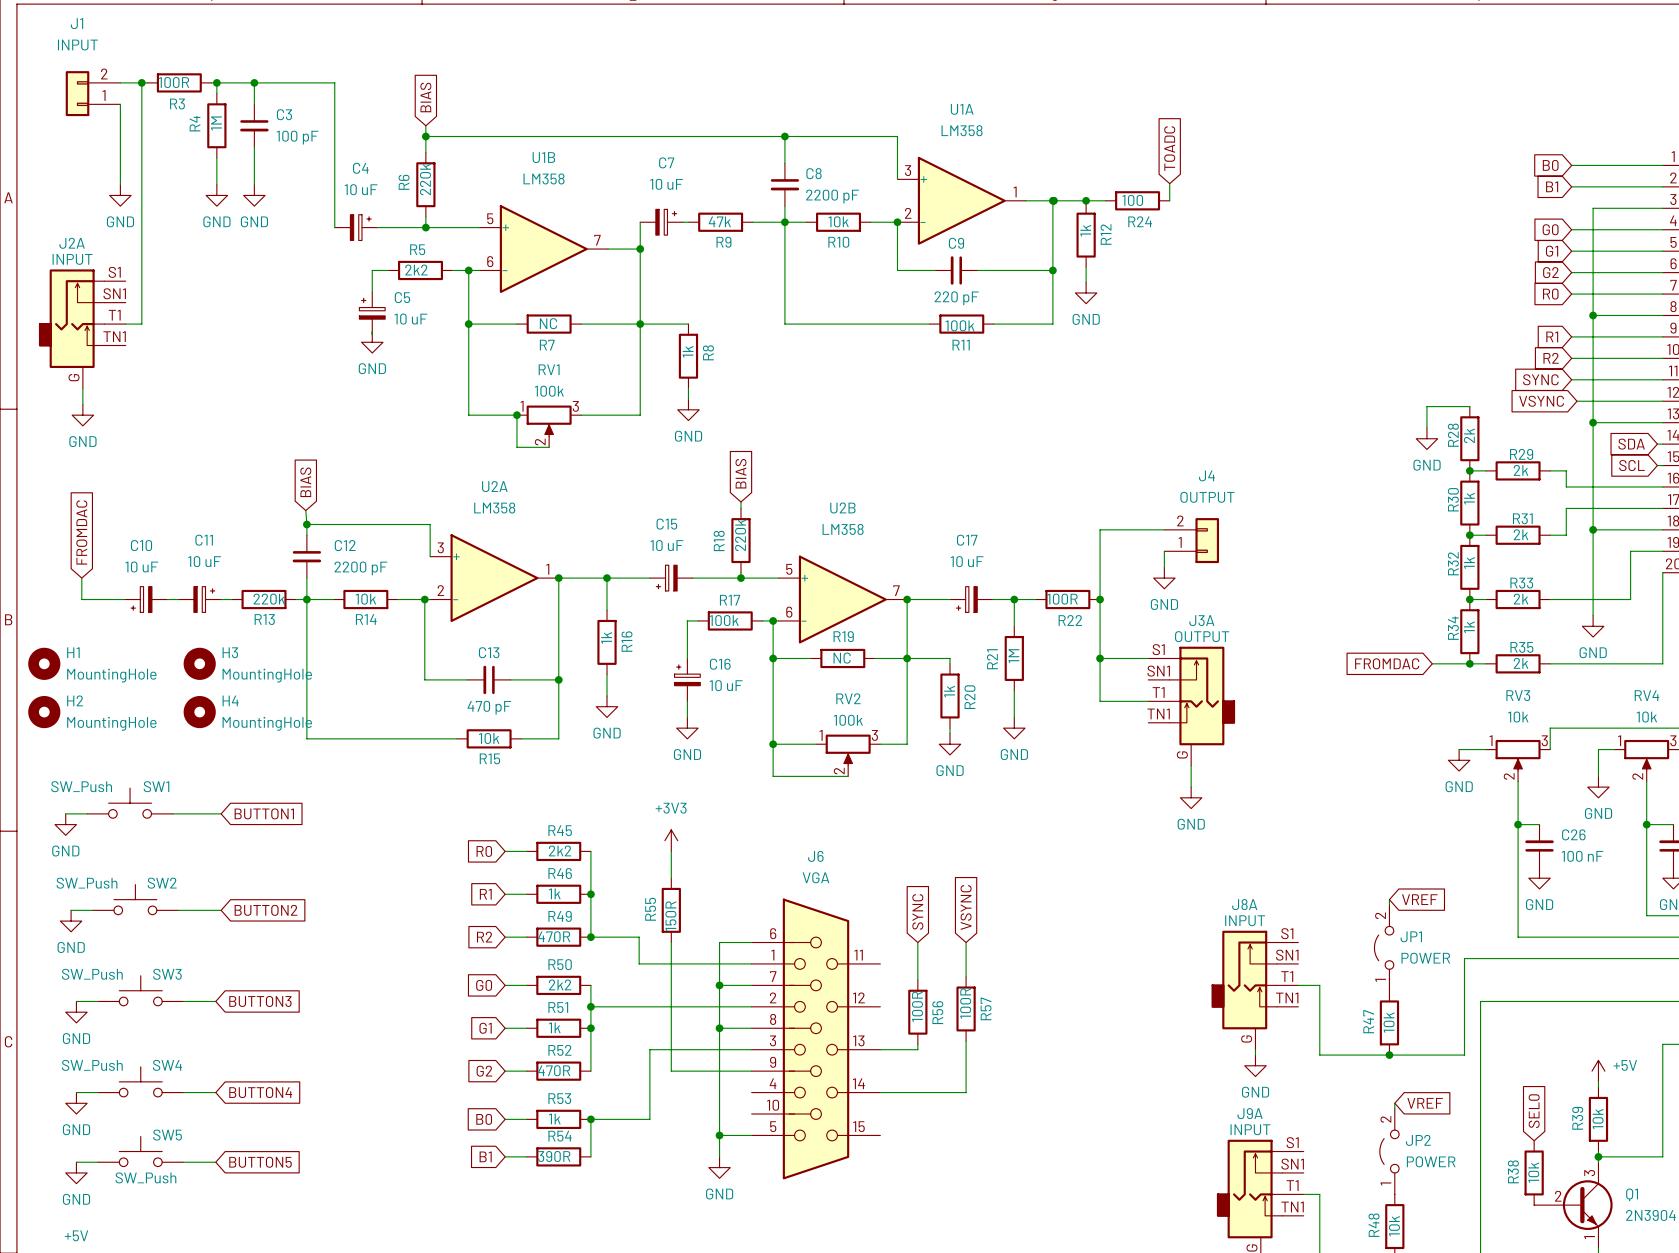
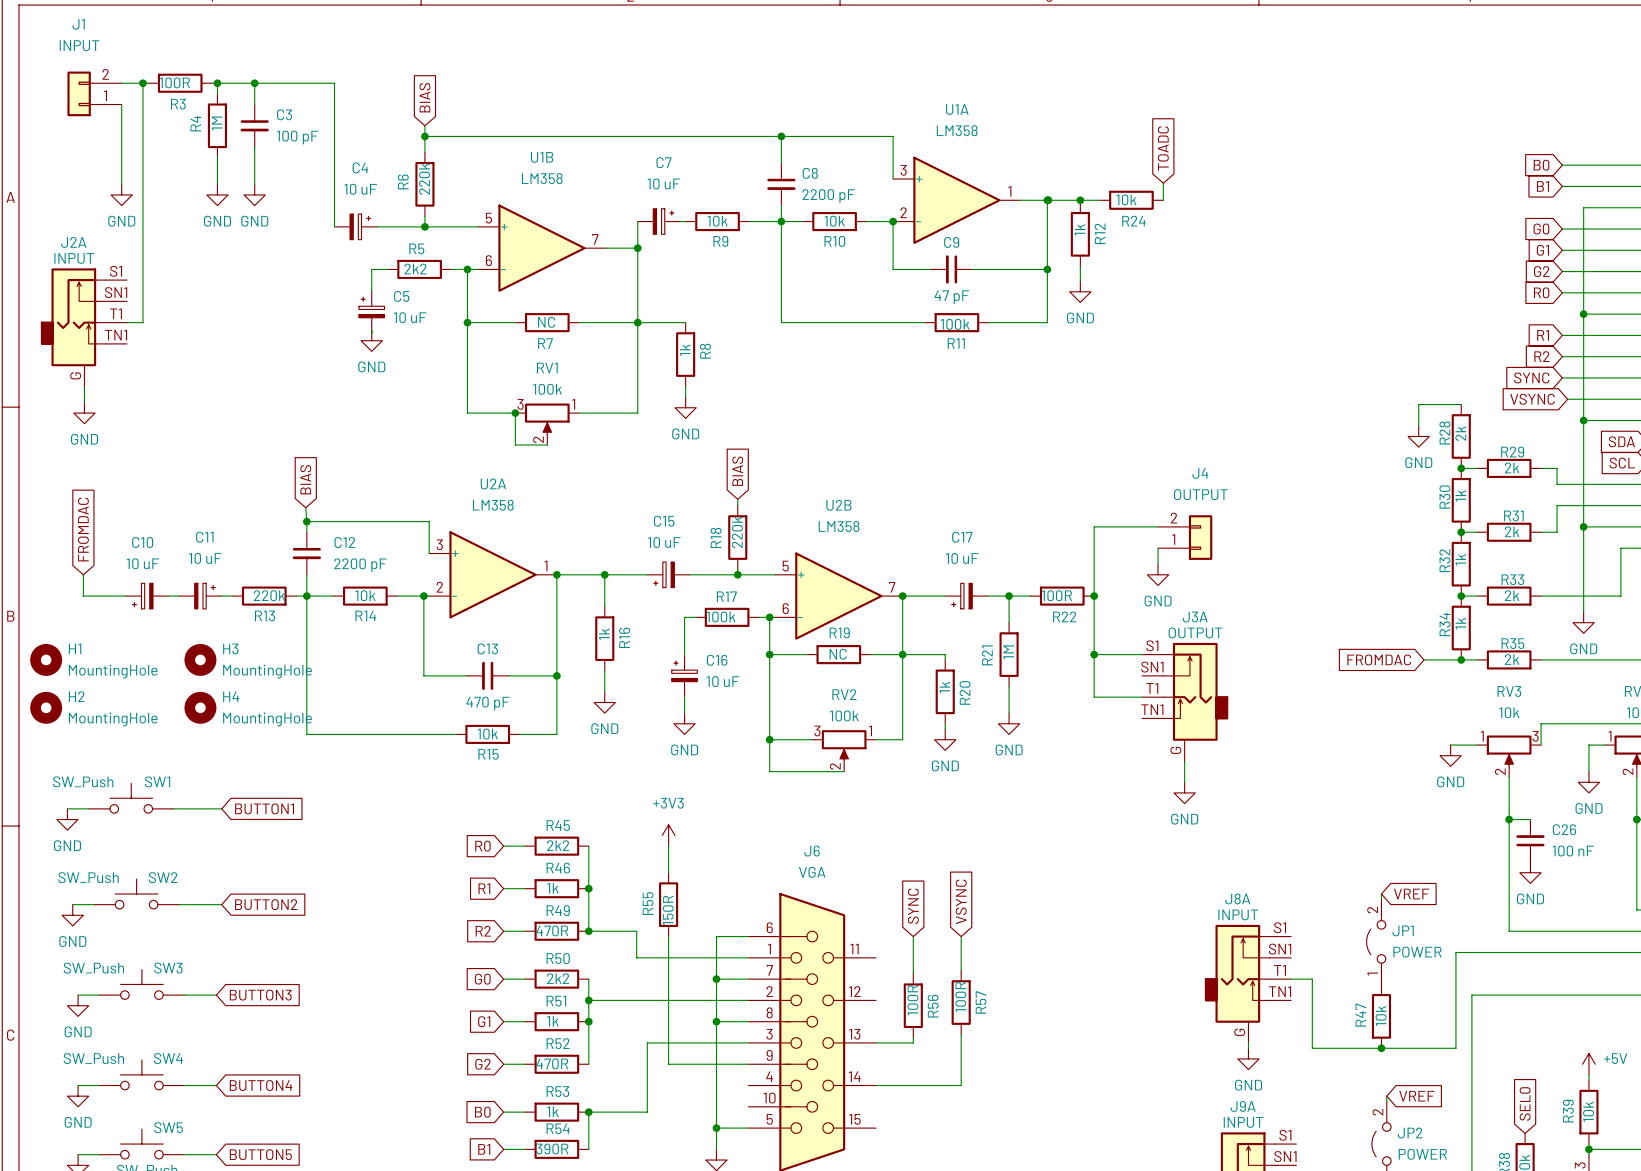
R24 value: 100 (1132, 200) -> 10k (1126, 199)
R9 value: 47k (719, 221) -> 10k (717, 221)
C9 value: 220 pF (956, 298) -> 47 pF (951, 297)
RV1 flip: as is (549, 421) -> left-right (547, 418)
RV2 flip: as is (848, 750) -> left-right (844, 745)

